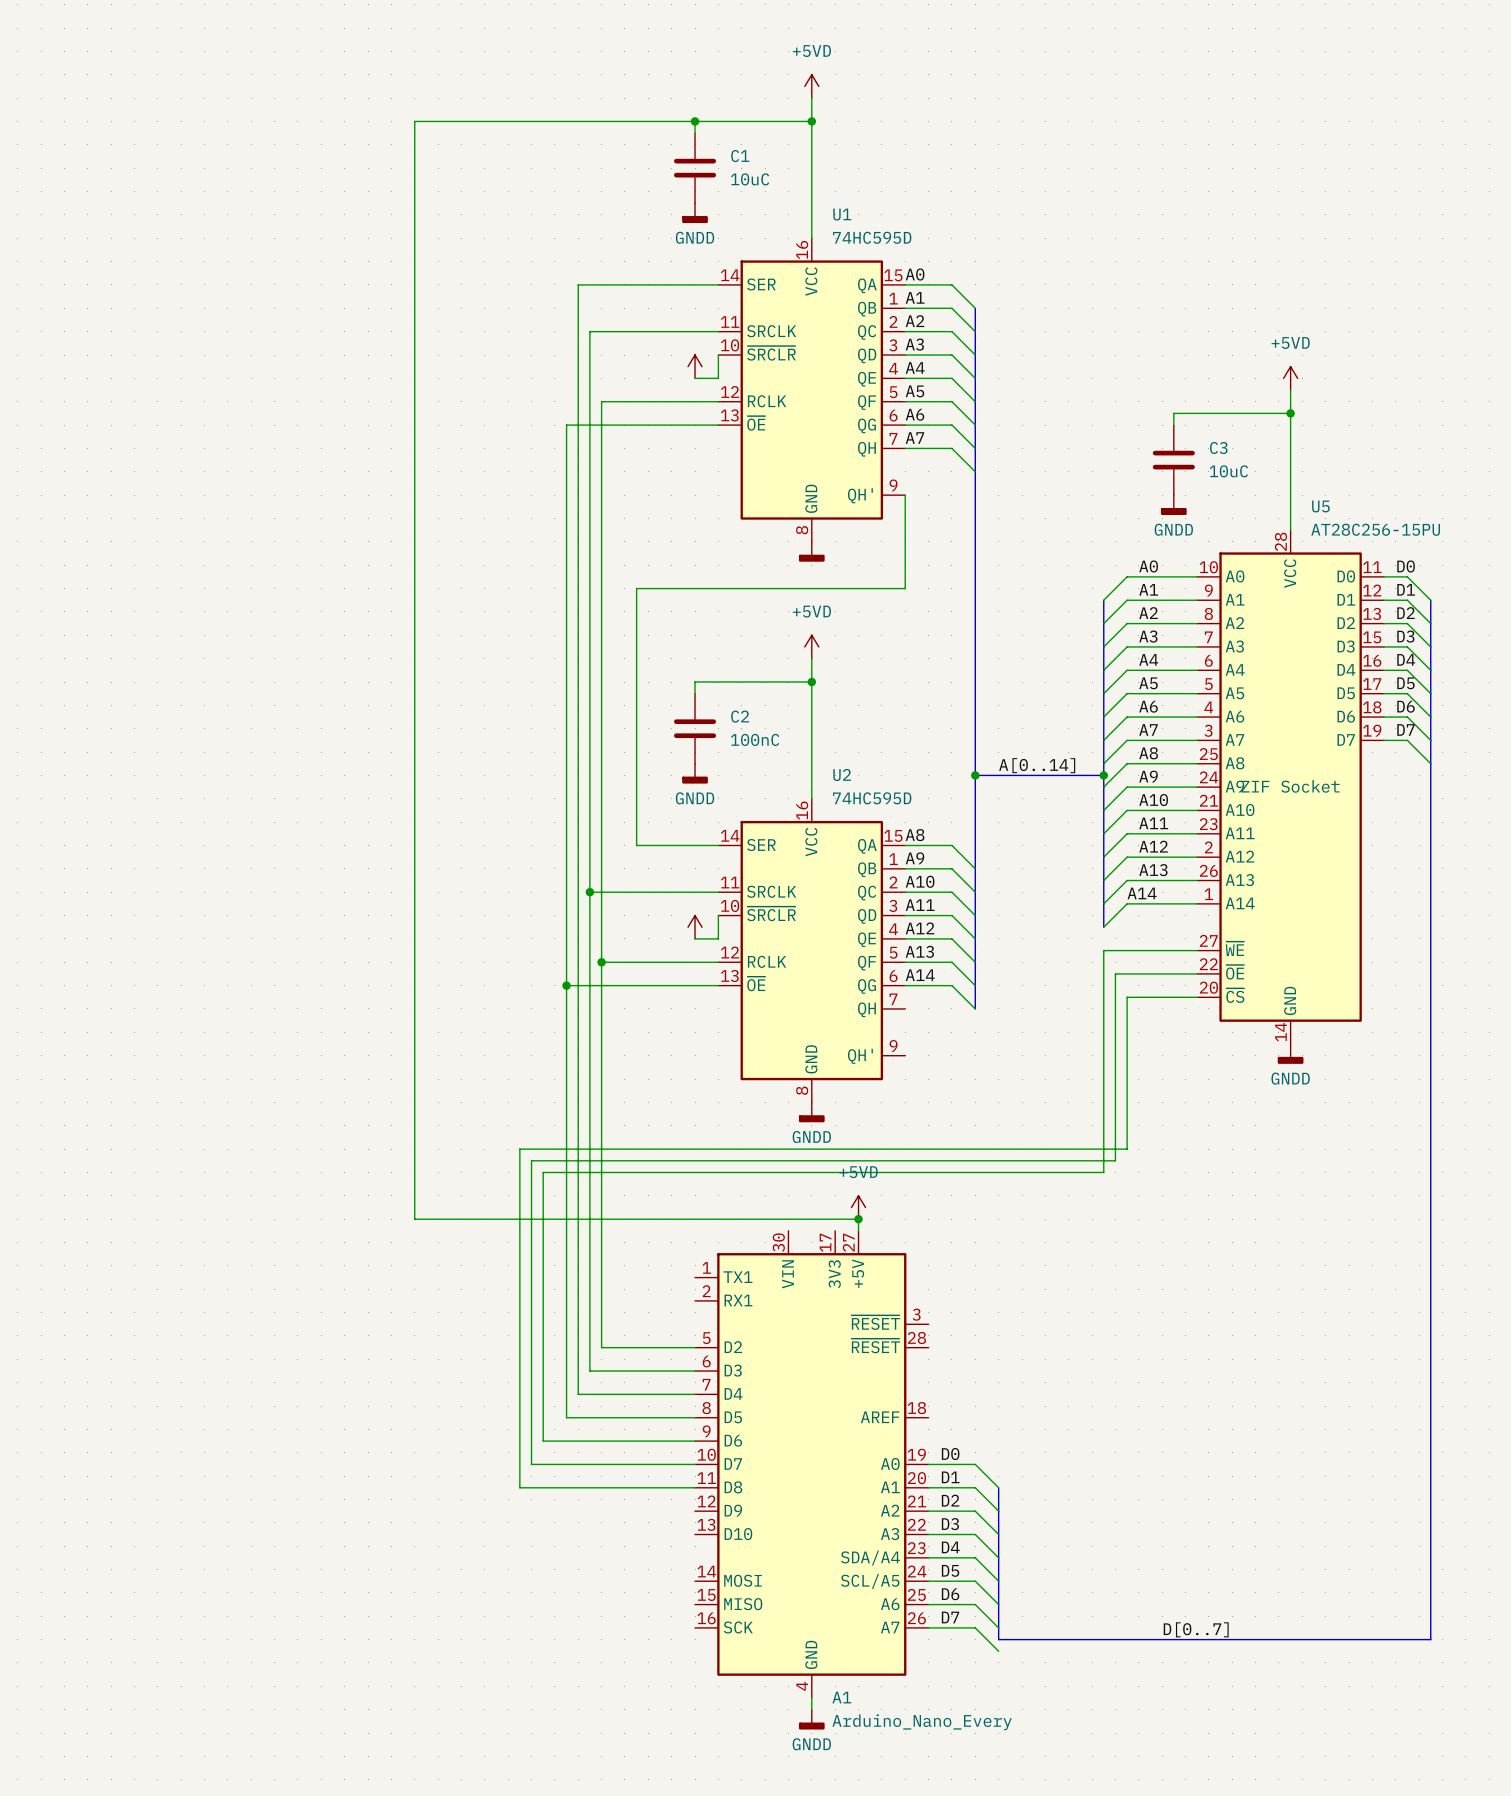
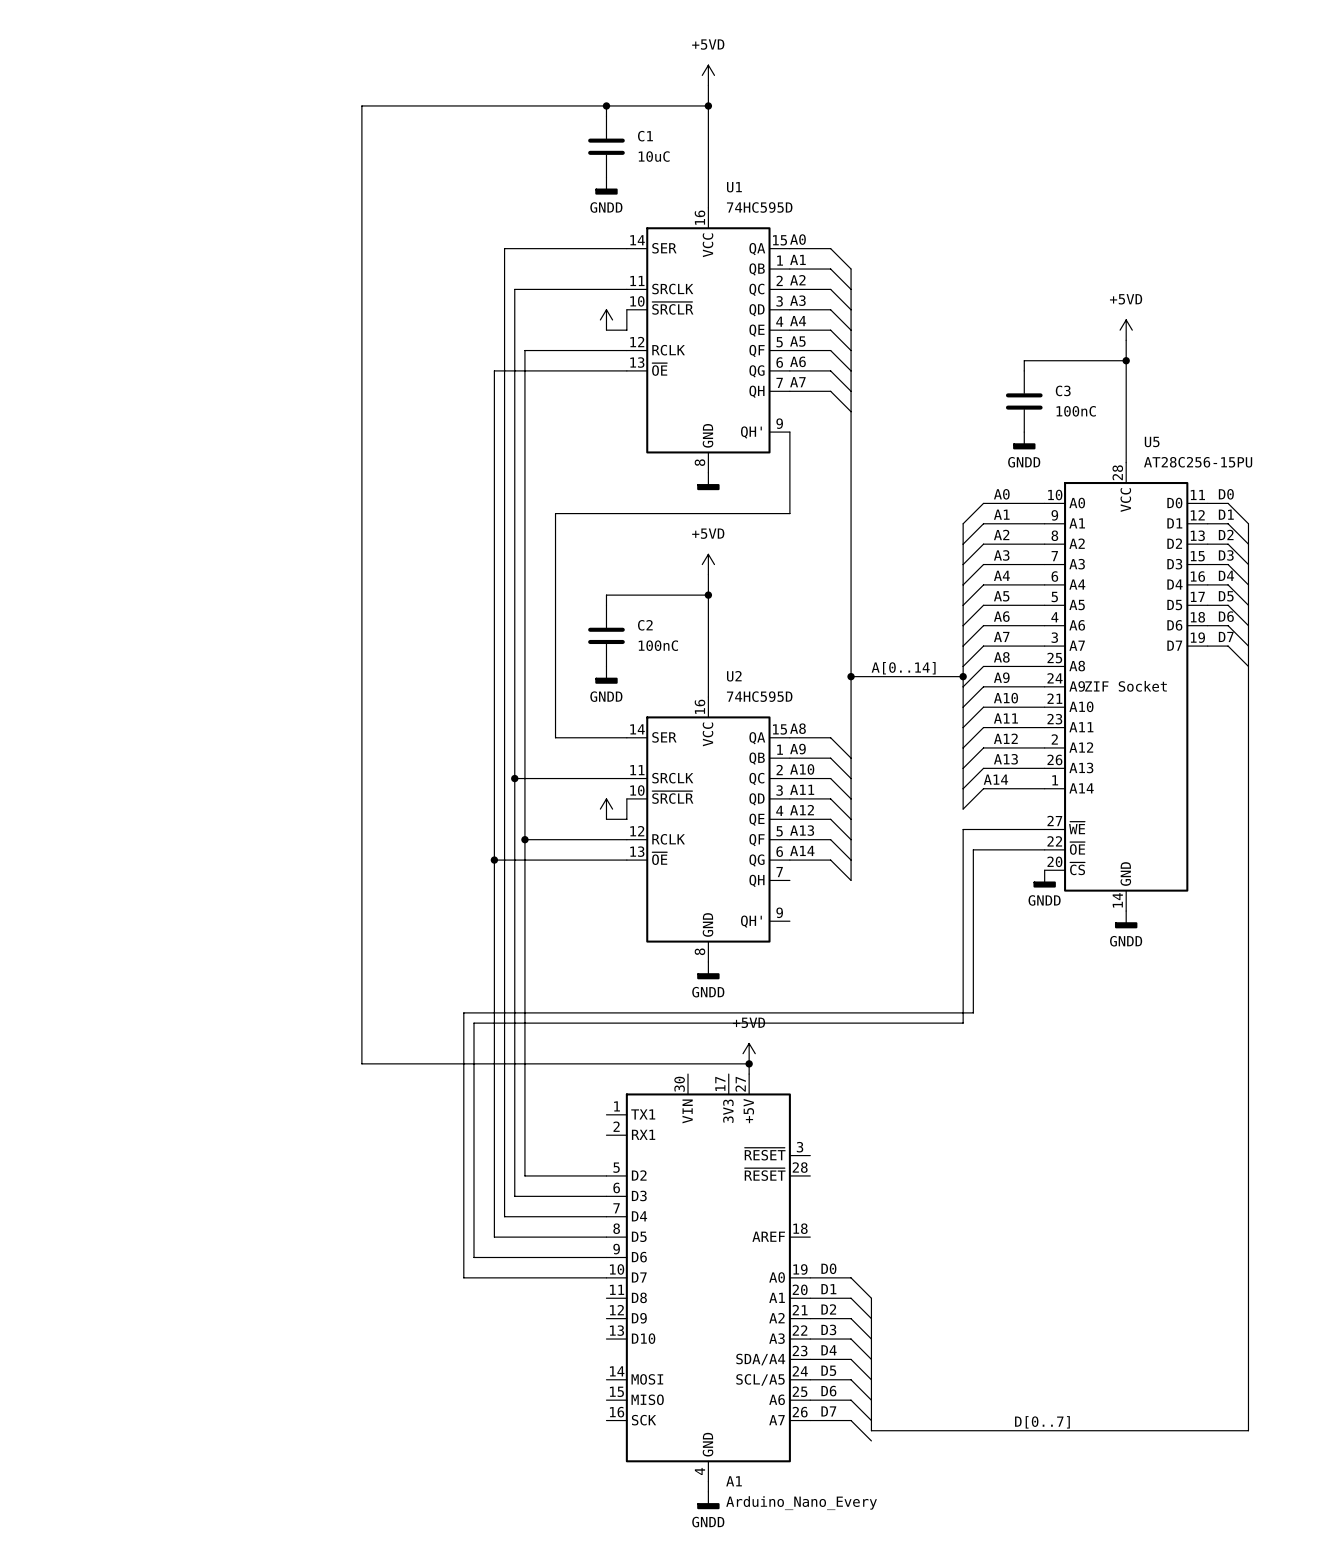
C3 value: 10uC (1228, 471) -> 100nC (1076, 411)
wire: (1197, 997) (1127, 997) (1127, 1149) (519, 1149) (519, 1487) (695, 1487) -> none
power symbol: none -> GNDD (1044, 878)

